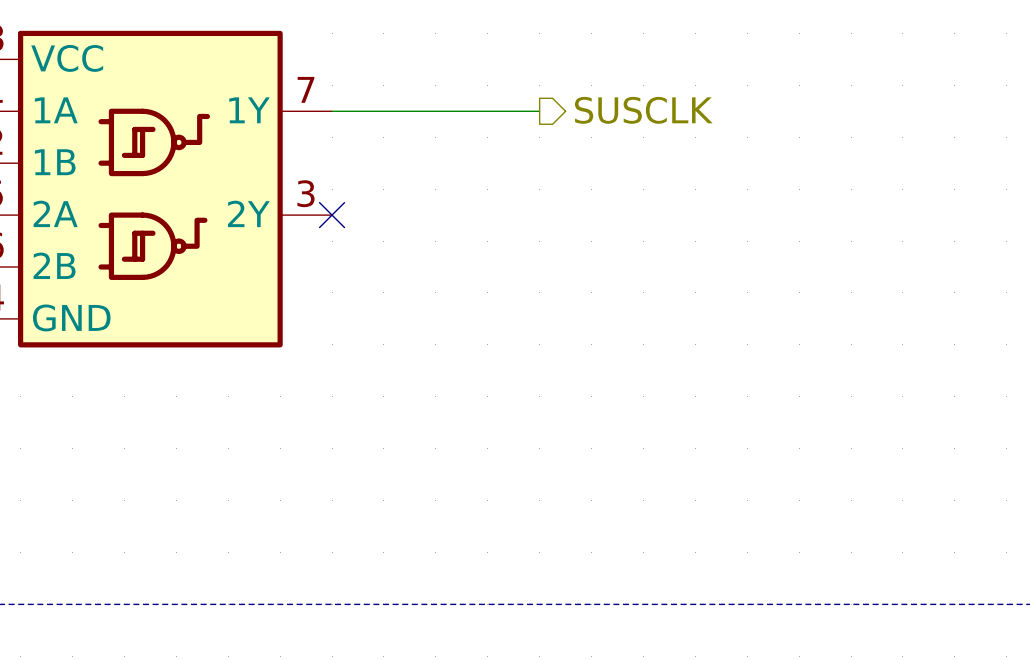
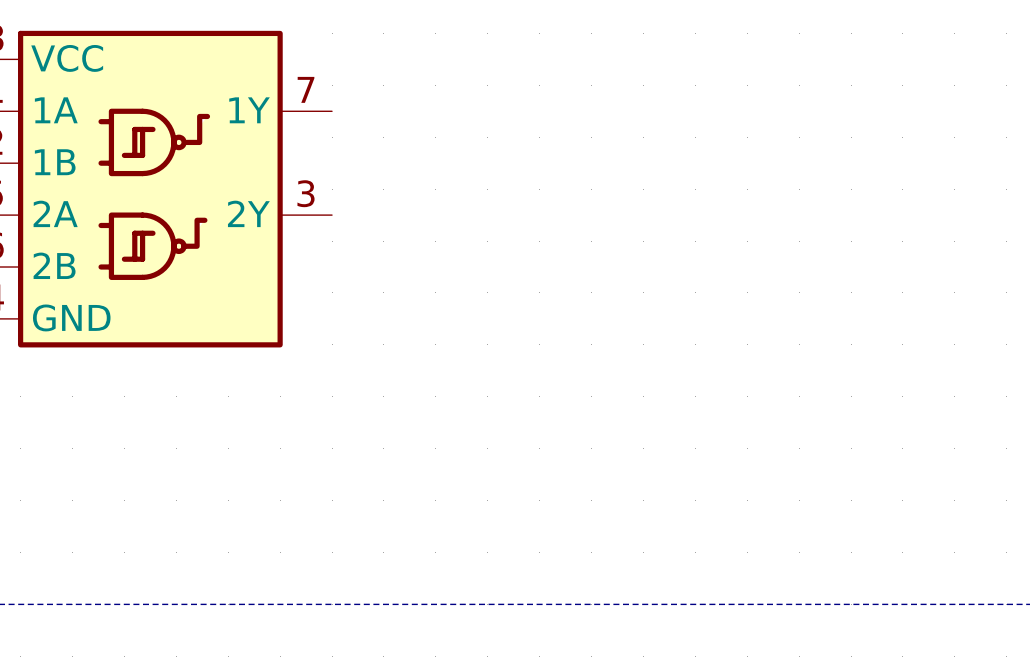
hierarchical label: SUSCLK (643, 110) -> none
wire: (332, 111) (539, 111) -> none
no-connect mark: (332, 215) -> none

